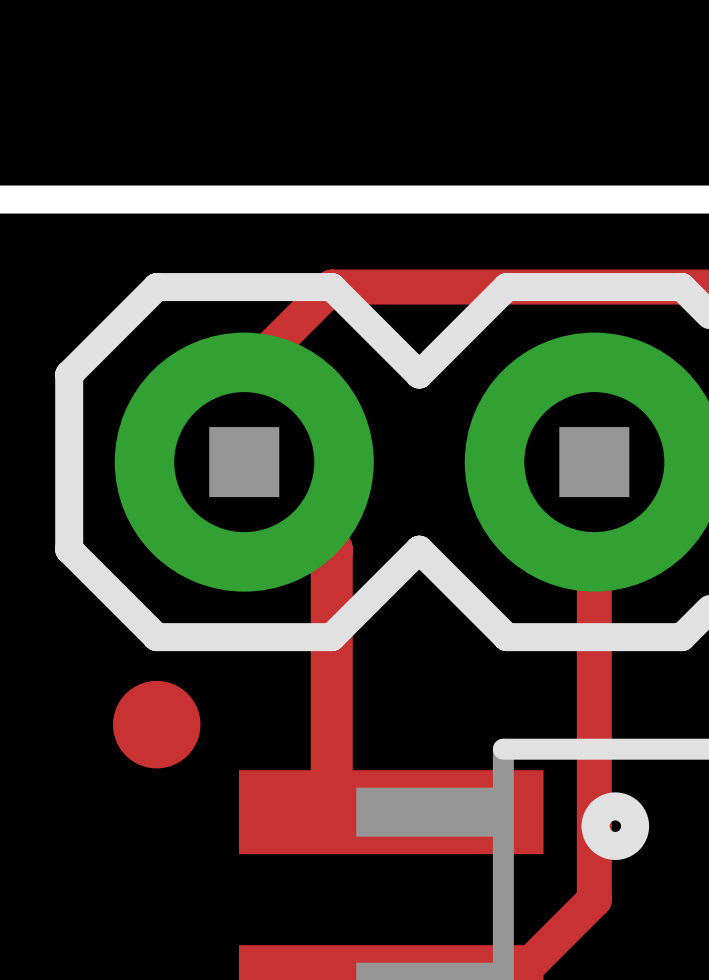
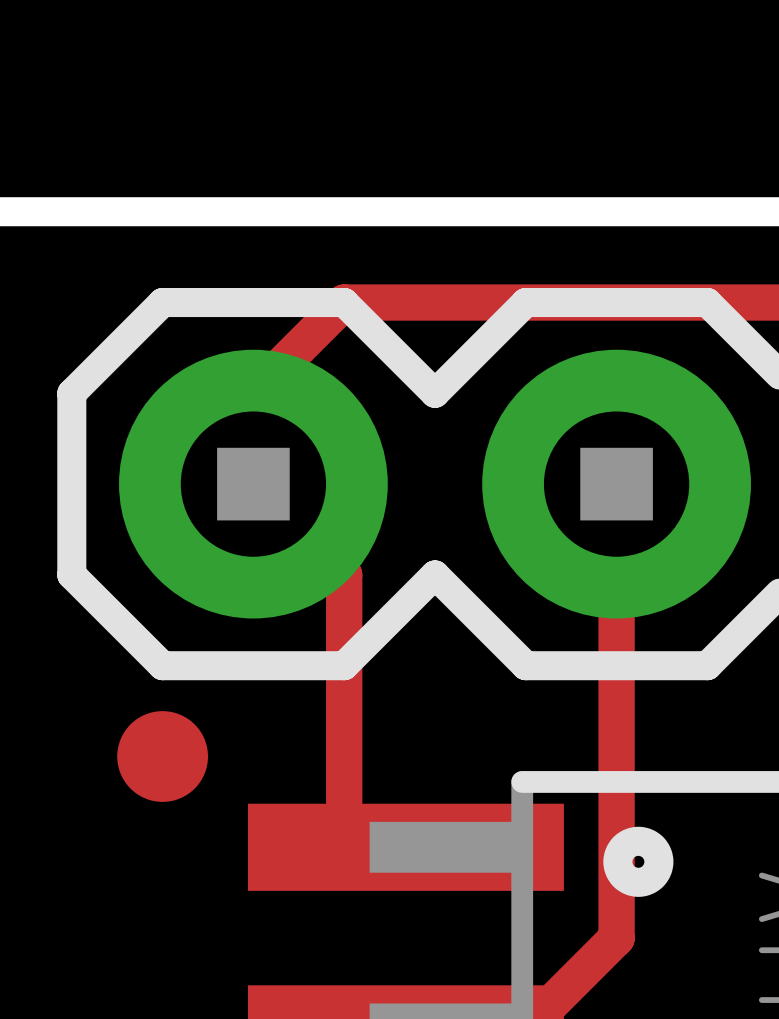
track width: thick (244, 462) (331, 549) (331, 829) -> thin (253, 484) (344, 574) (344, 865)

